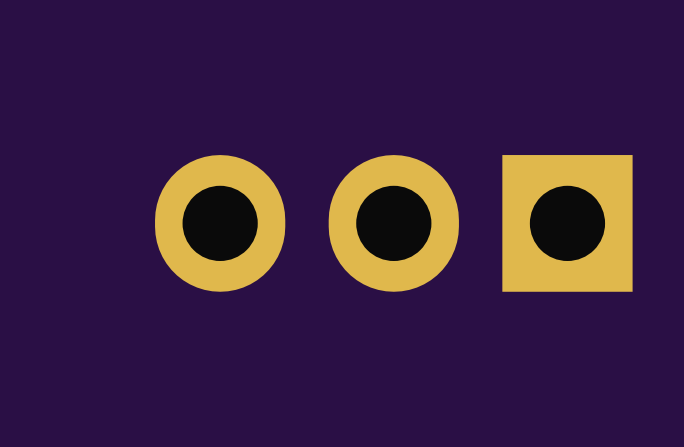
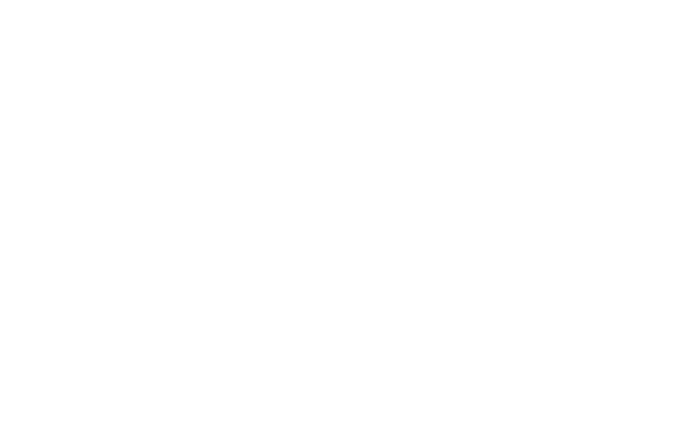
part: (393, 223) -> none

